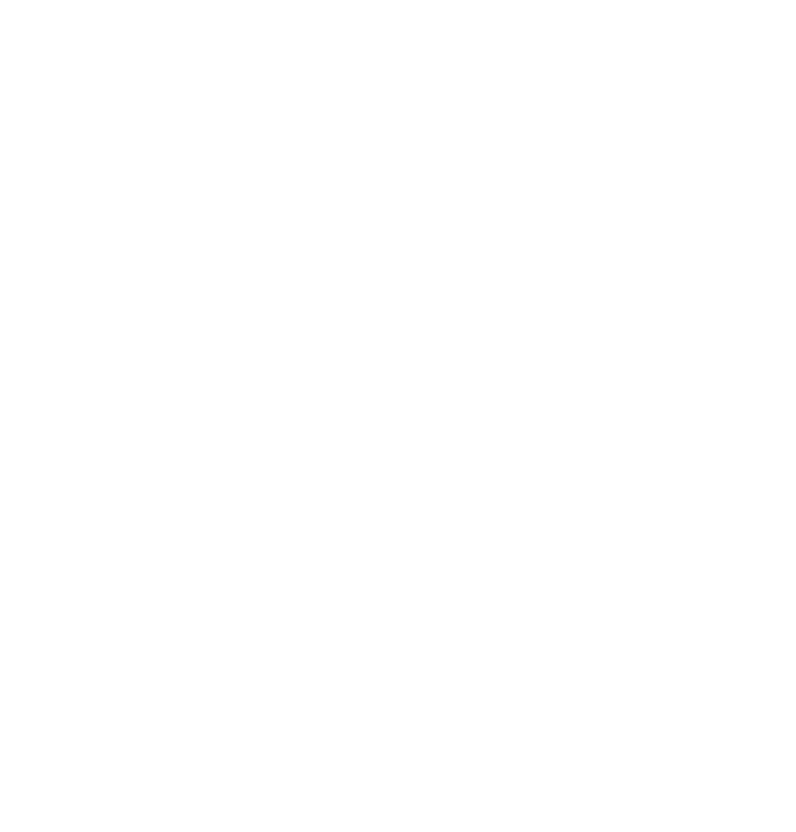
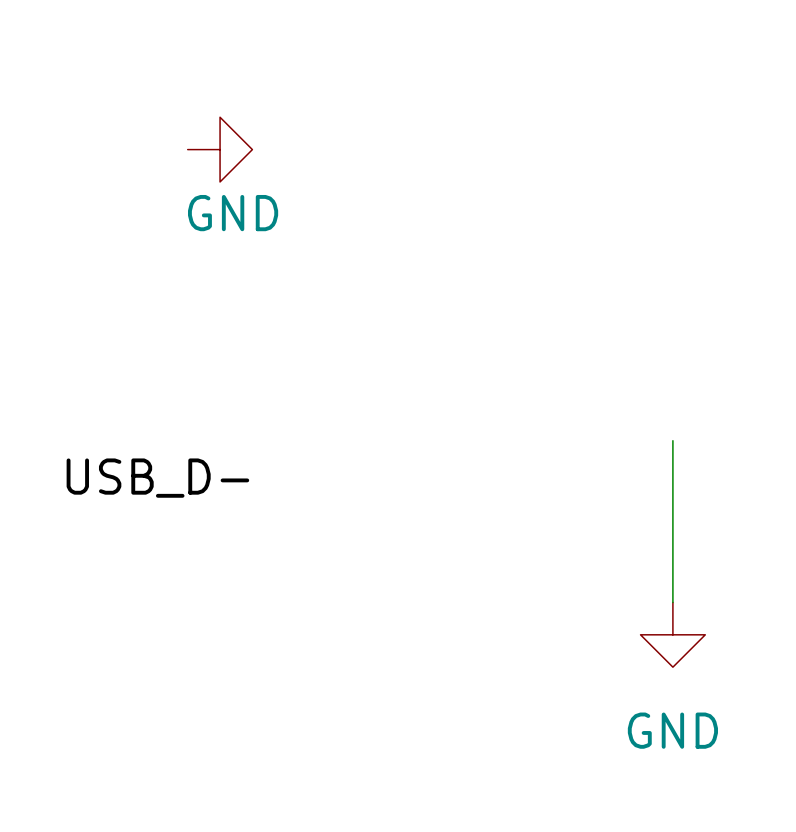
power symbol: none -> GND (220, 149)
wire: none -> (672, 440) (672, 602)
label: none -> USB_D- (157, 478)
power symbol: none -> GND (672, 634)

